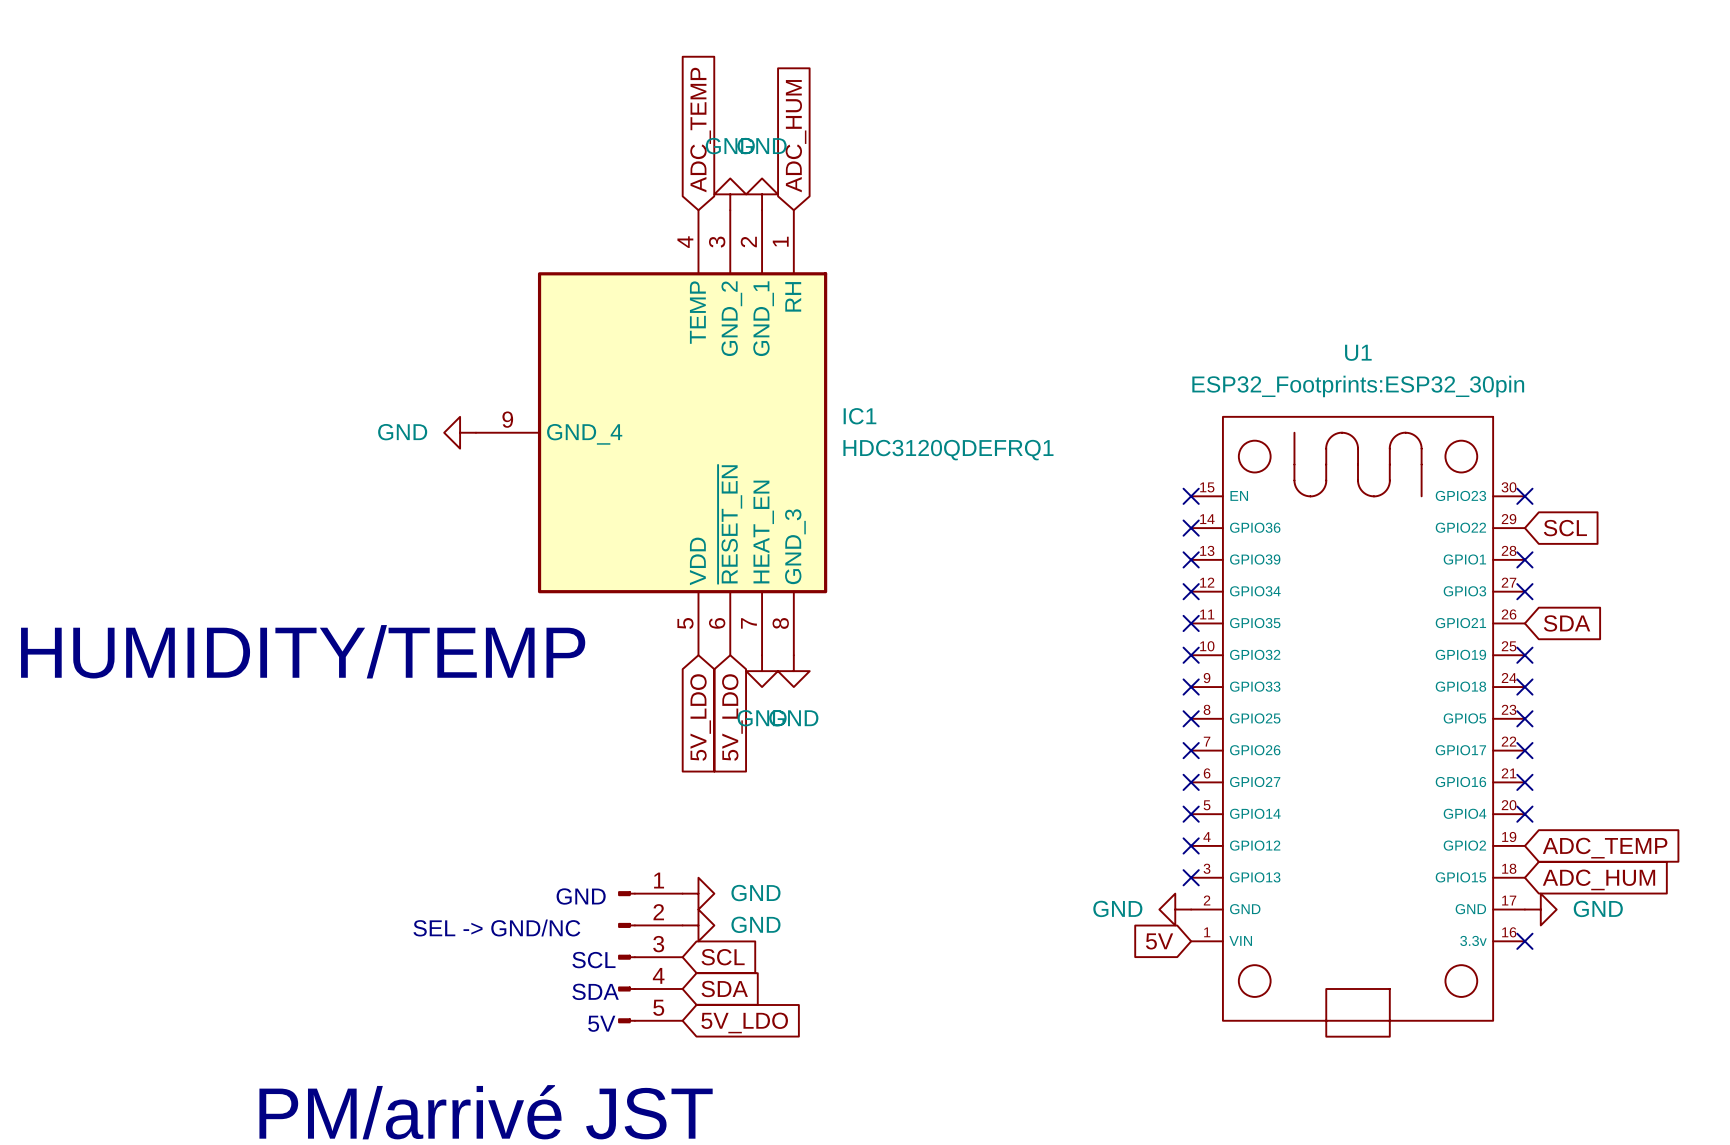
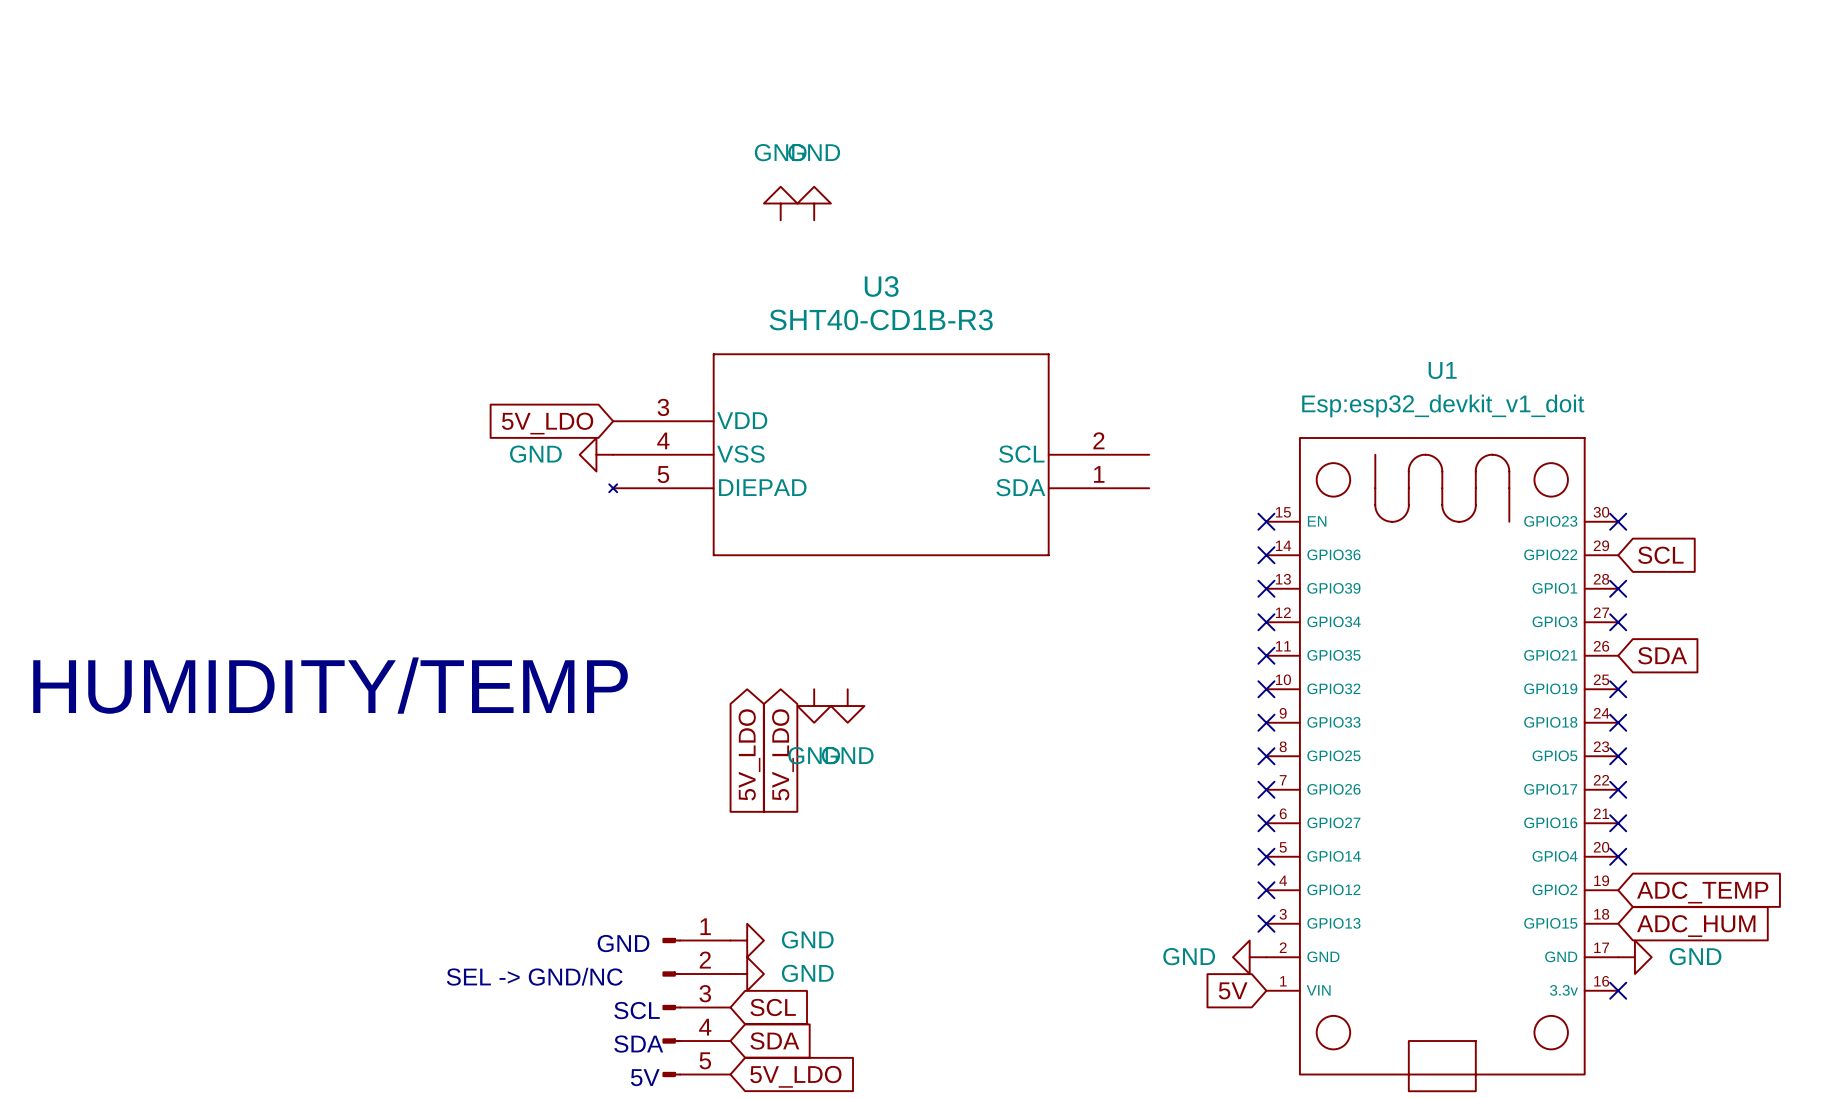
global label: ADC_TEMP (700, 130) -> none
global label: ADC_HUM (796, 136) -> none
U1 text: ESP32_Footprints:ESP32_30pin (1358, 386) -> Esp:esp32_devkit_v1_doit (1443, 405)
global label: none -> 5V_LDO (547, 423)
power symbol position: GND (460, 432) -> GND (596, 454)
IC1: HDC3120QDEFRQ1 (651, 432) -> none
U3: none -> SHT40-CD1B-R3 (879, 454)

